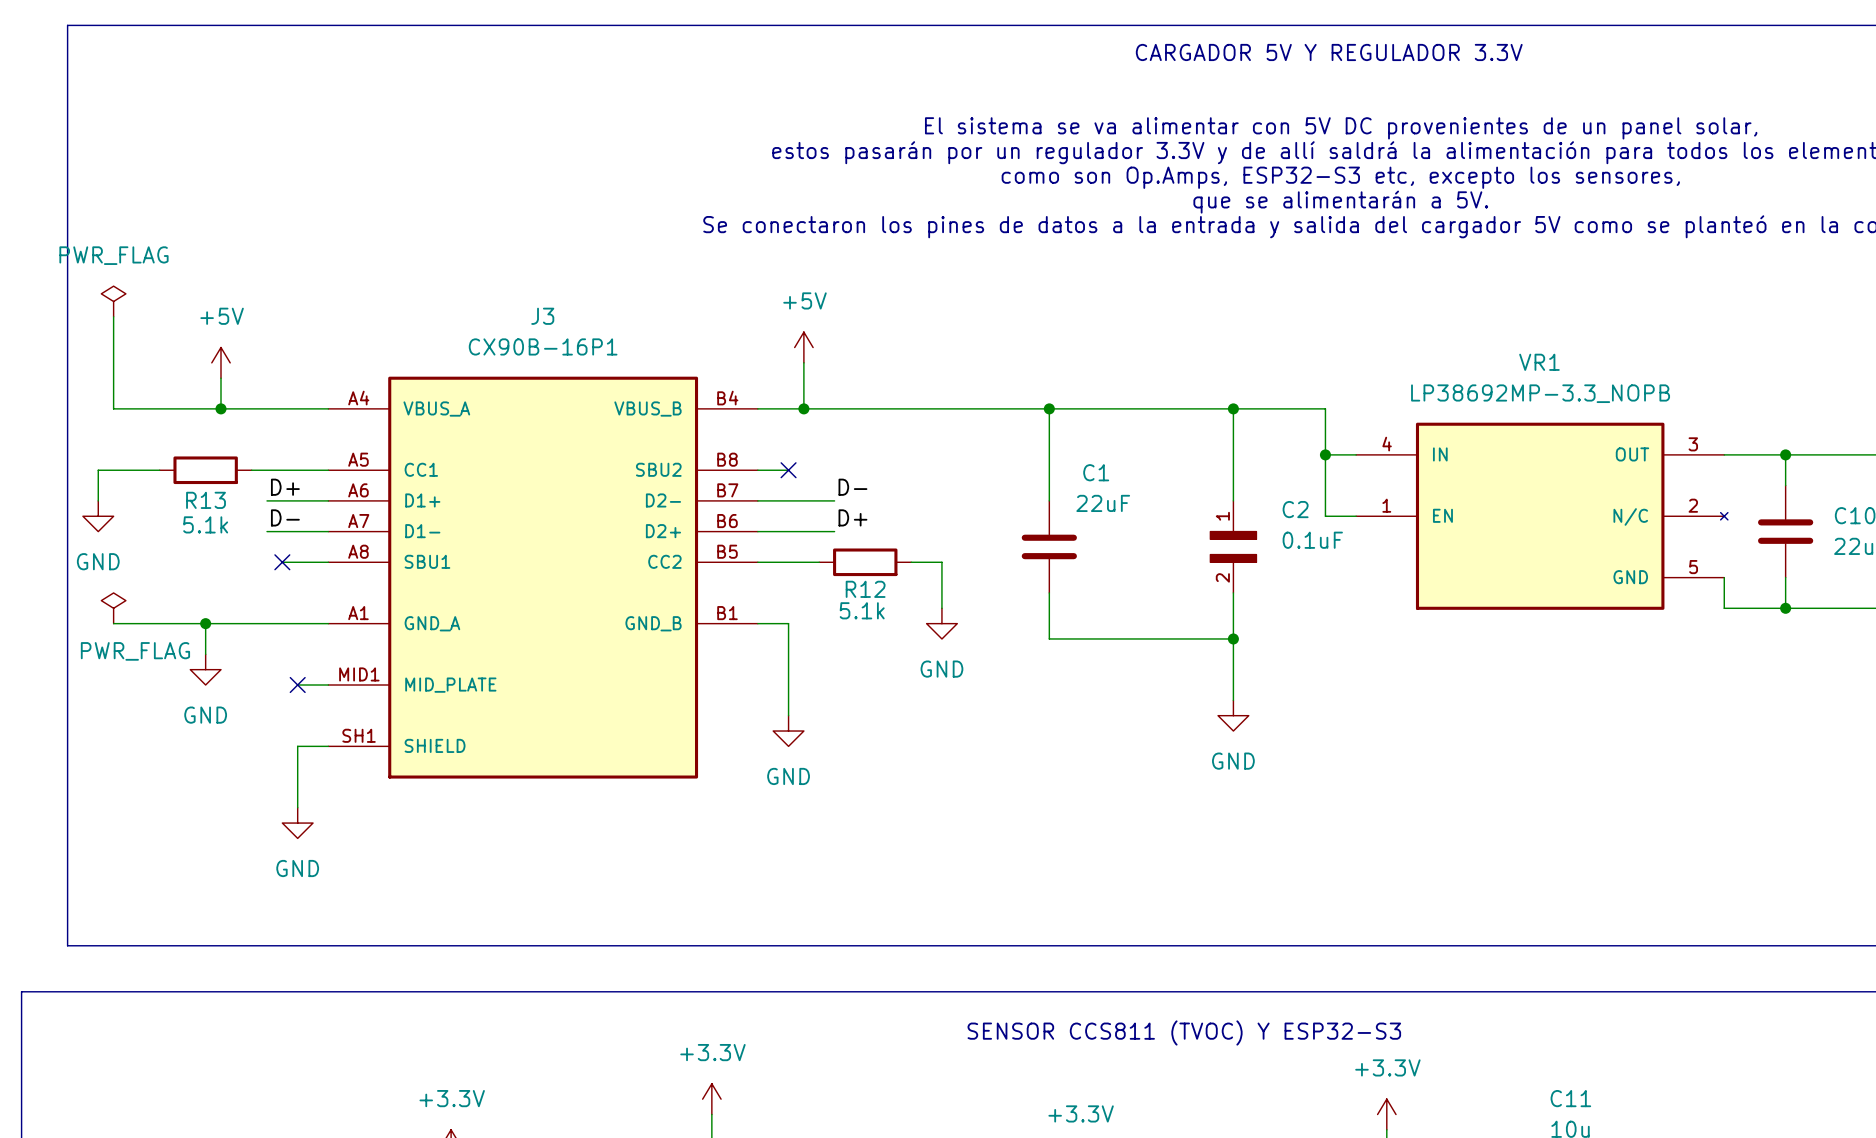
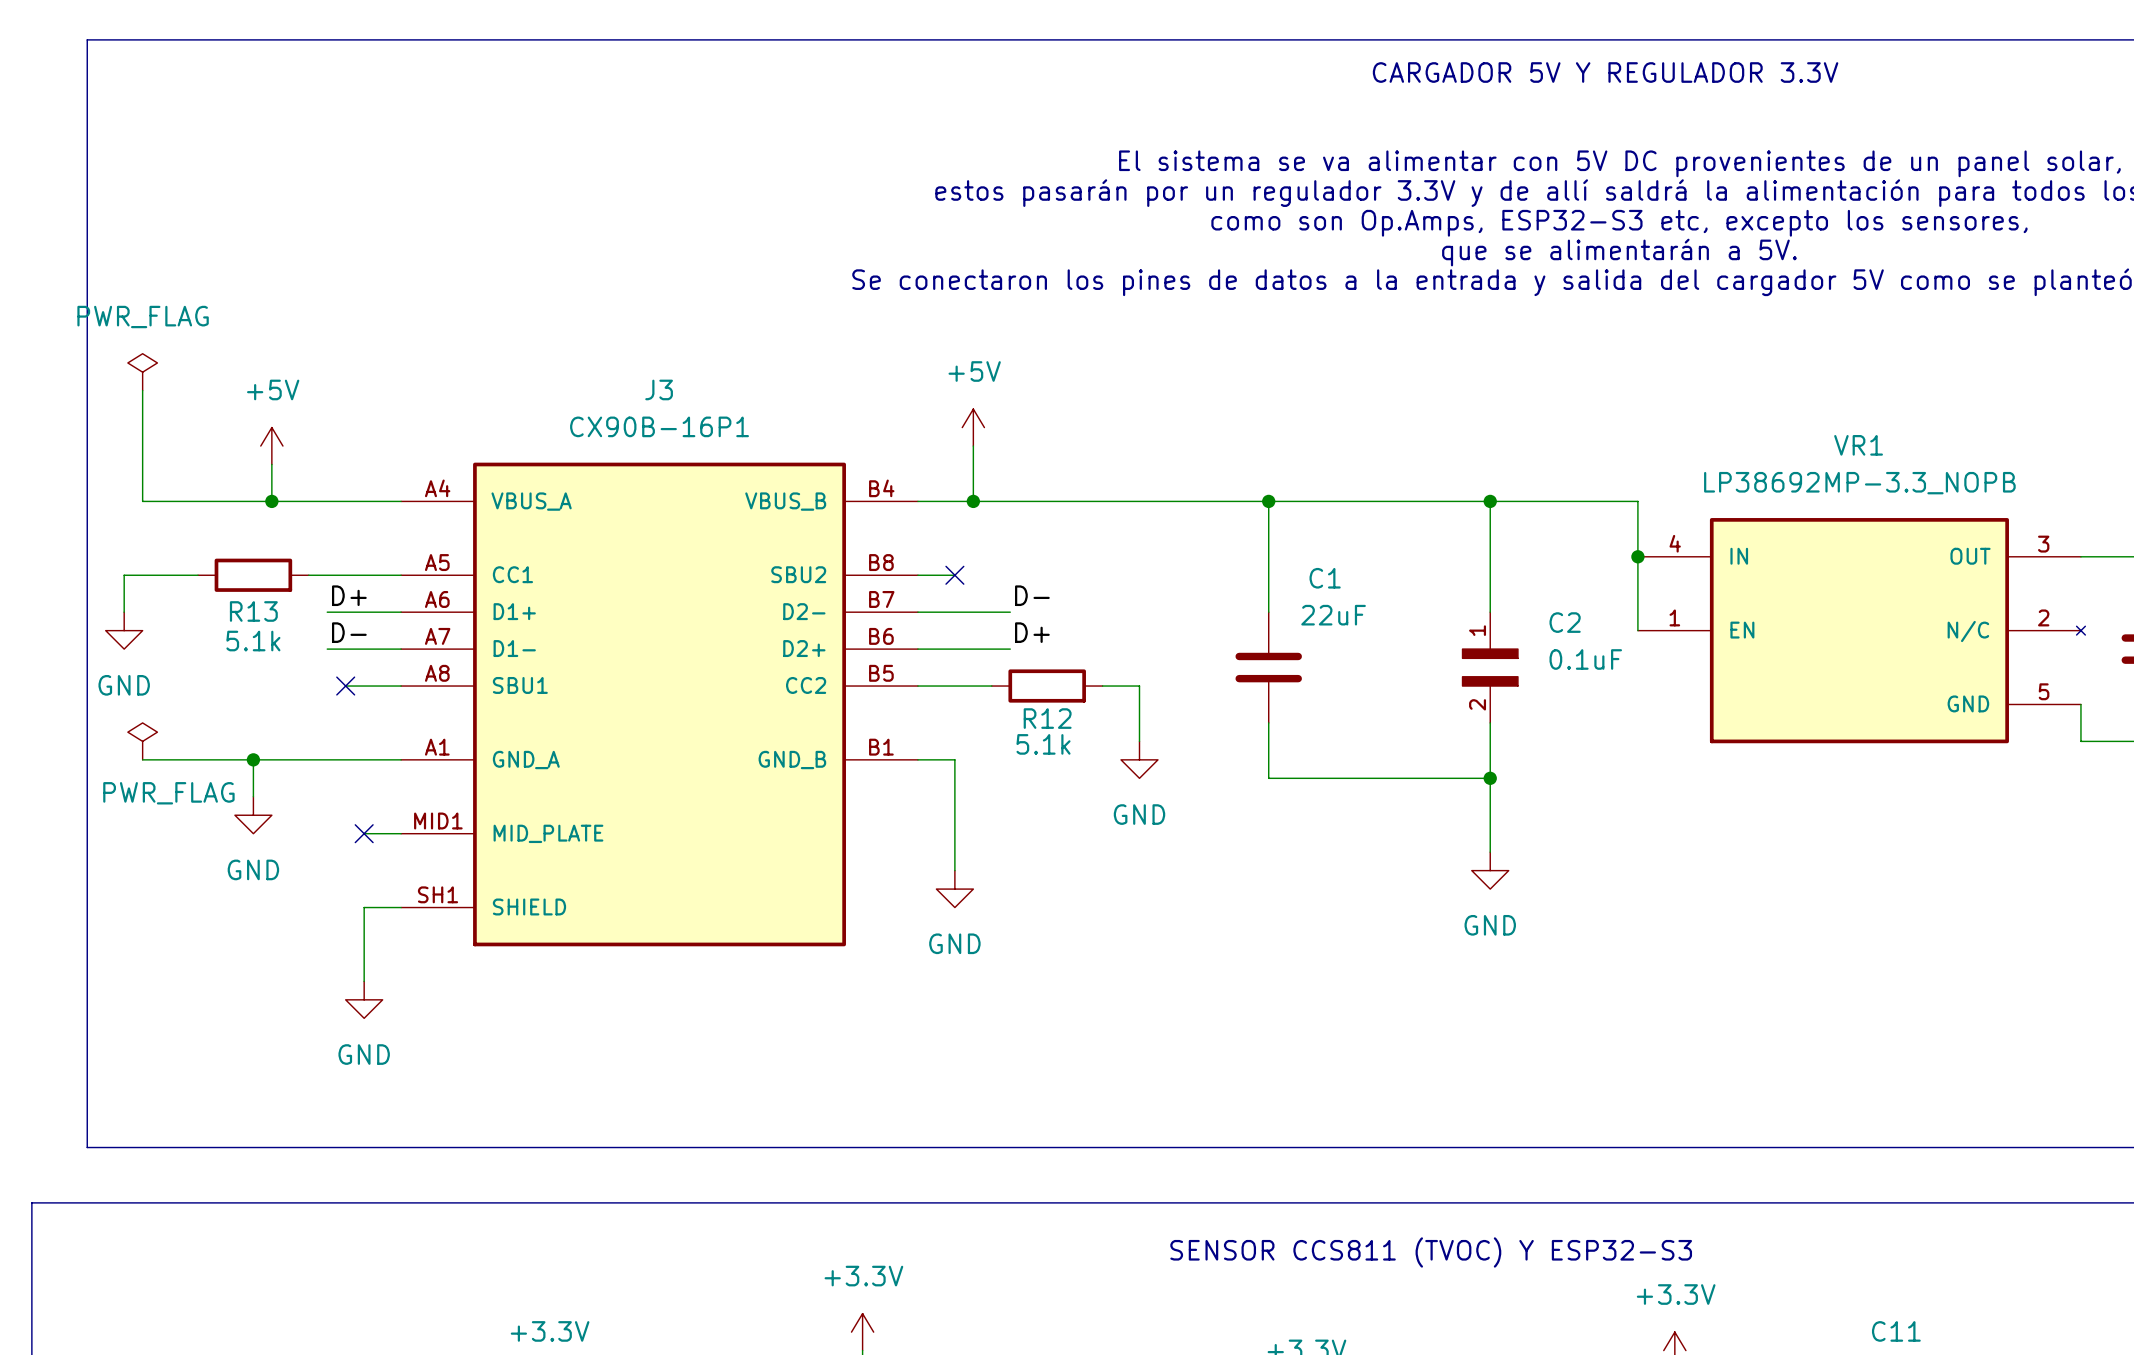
wire: (1325, 408) (1325, 516) (1356, 516) -> (1601, 501) (1637, 501) (1637, 630)
wire: (1325, 454) (1356, 454) -> none
junction position: (1325, 454) -> (1637, 556)

